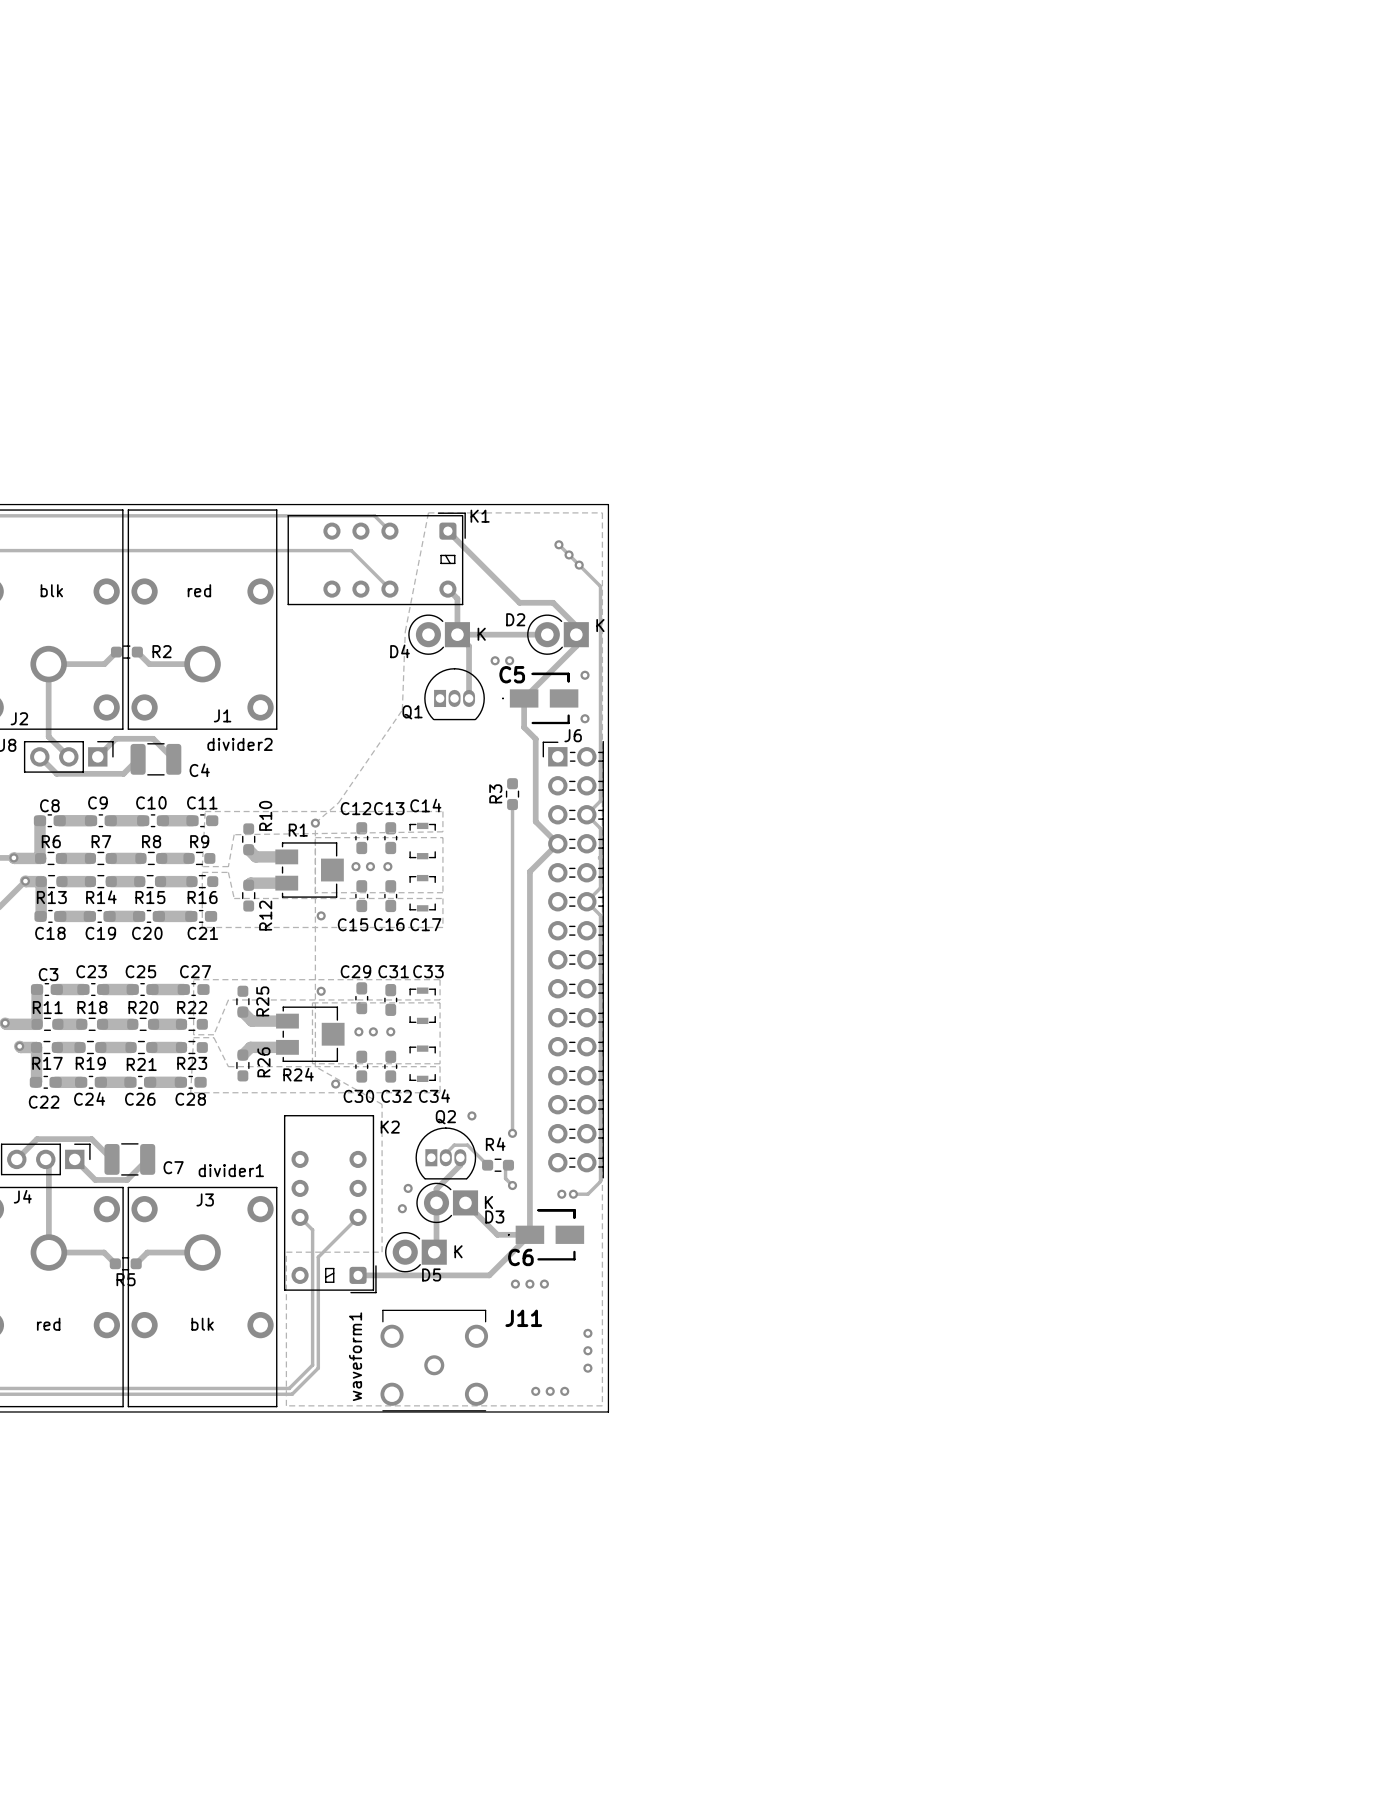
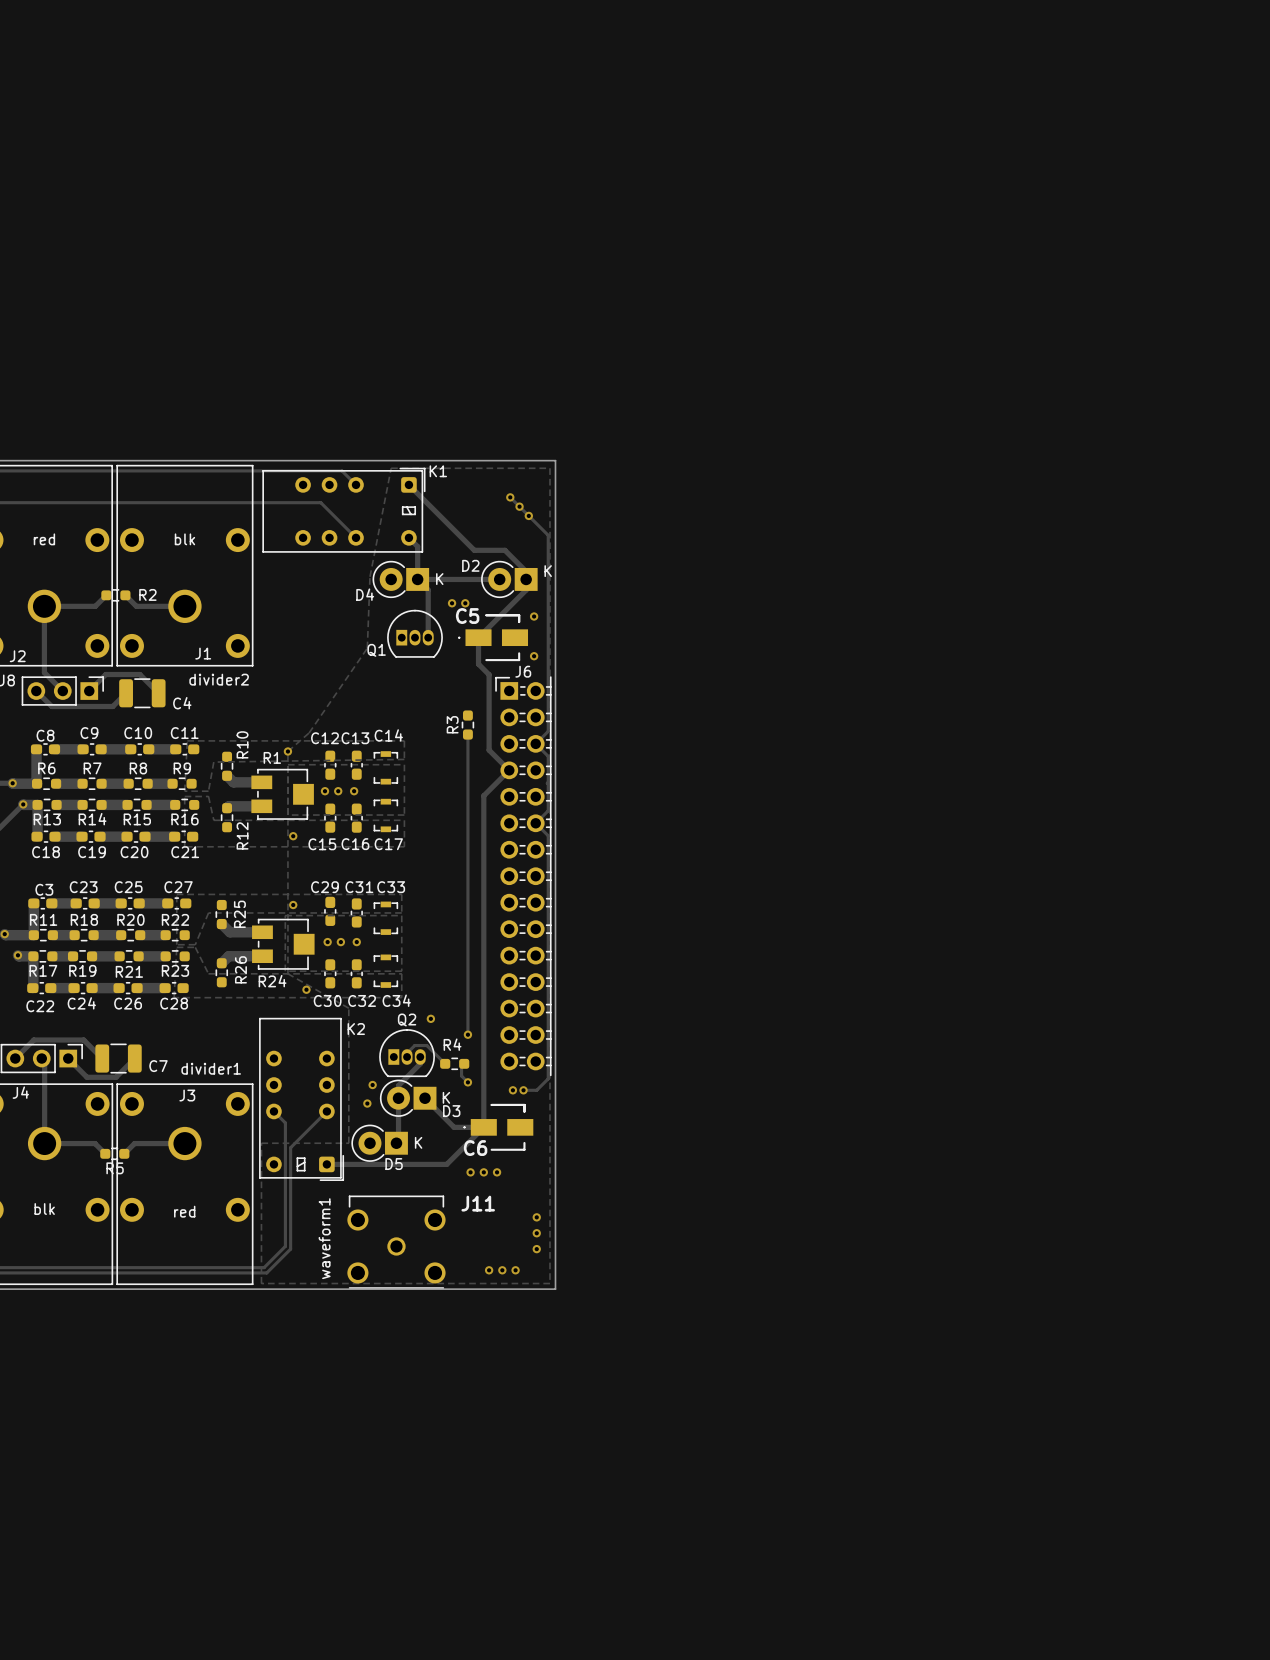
text: blk (51, 590) -> red (44, 539)
text: red (199, 590) -> blk (184, 539)
text: red (48, 1324) -> blk (44, 1209)
text: blk (202, 1324) -> red (184, 1211)

